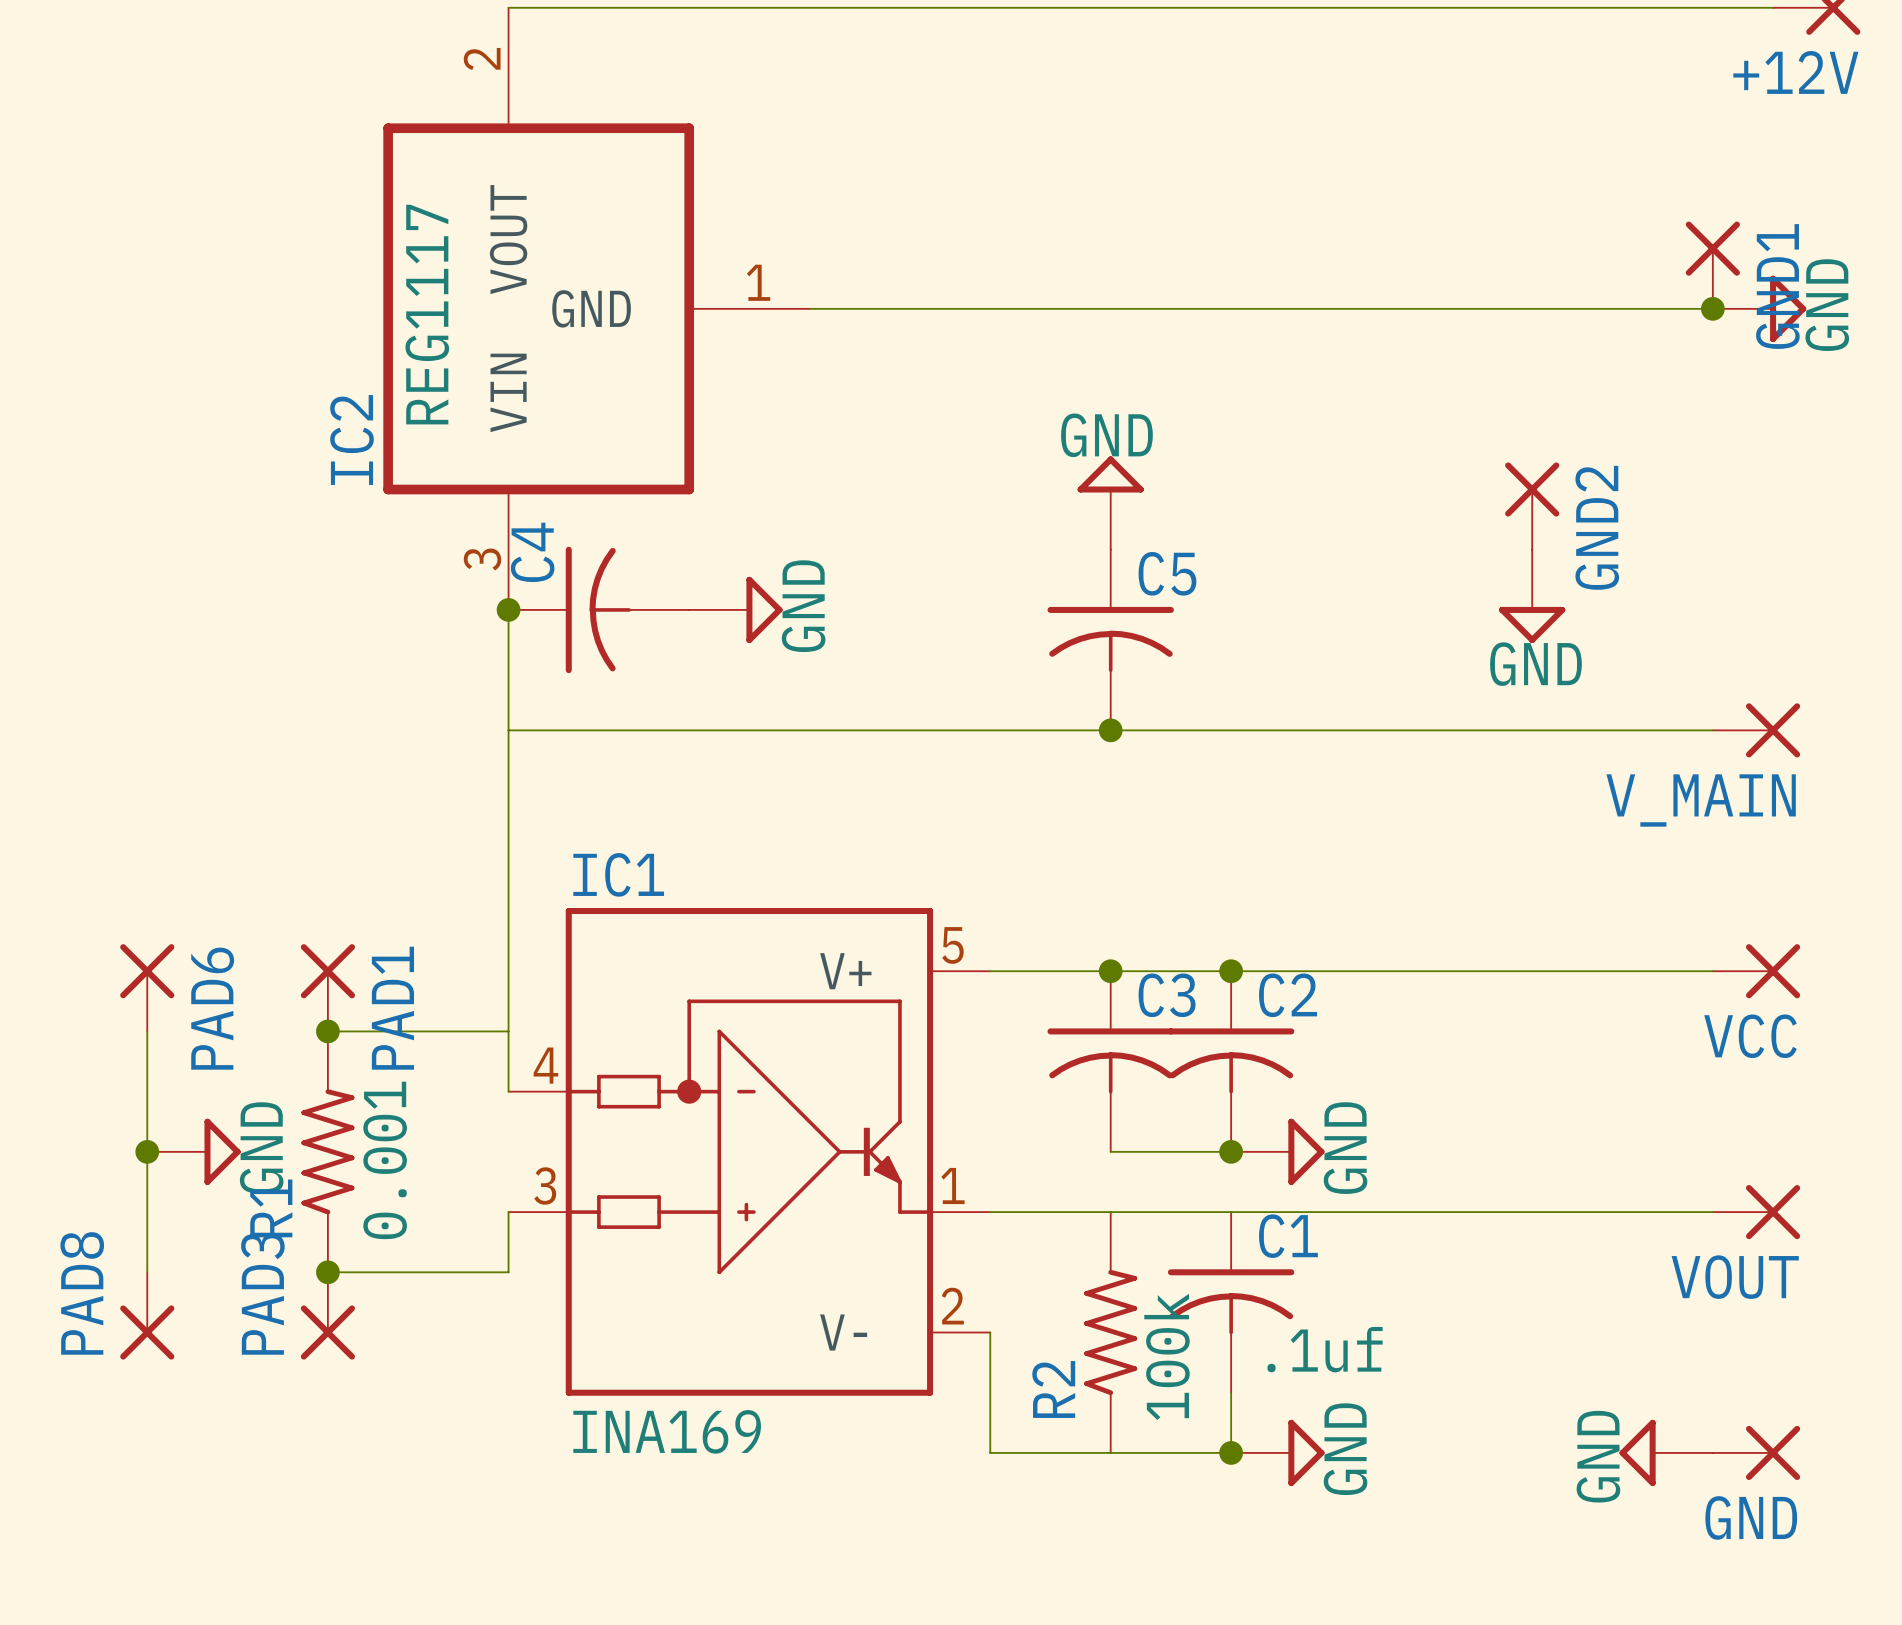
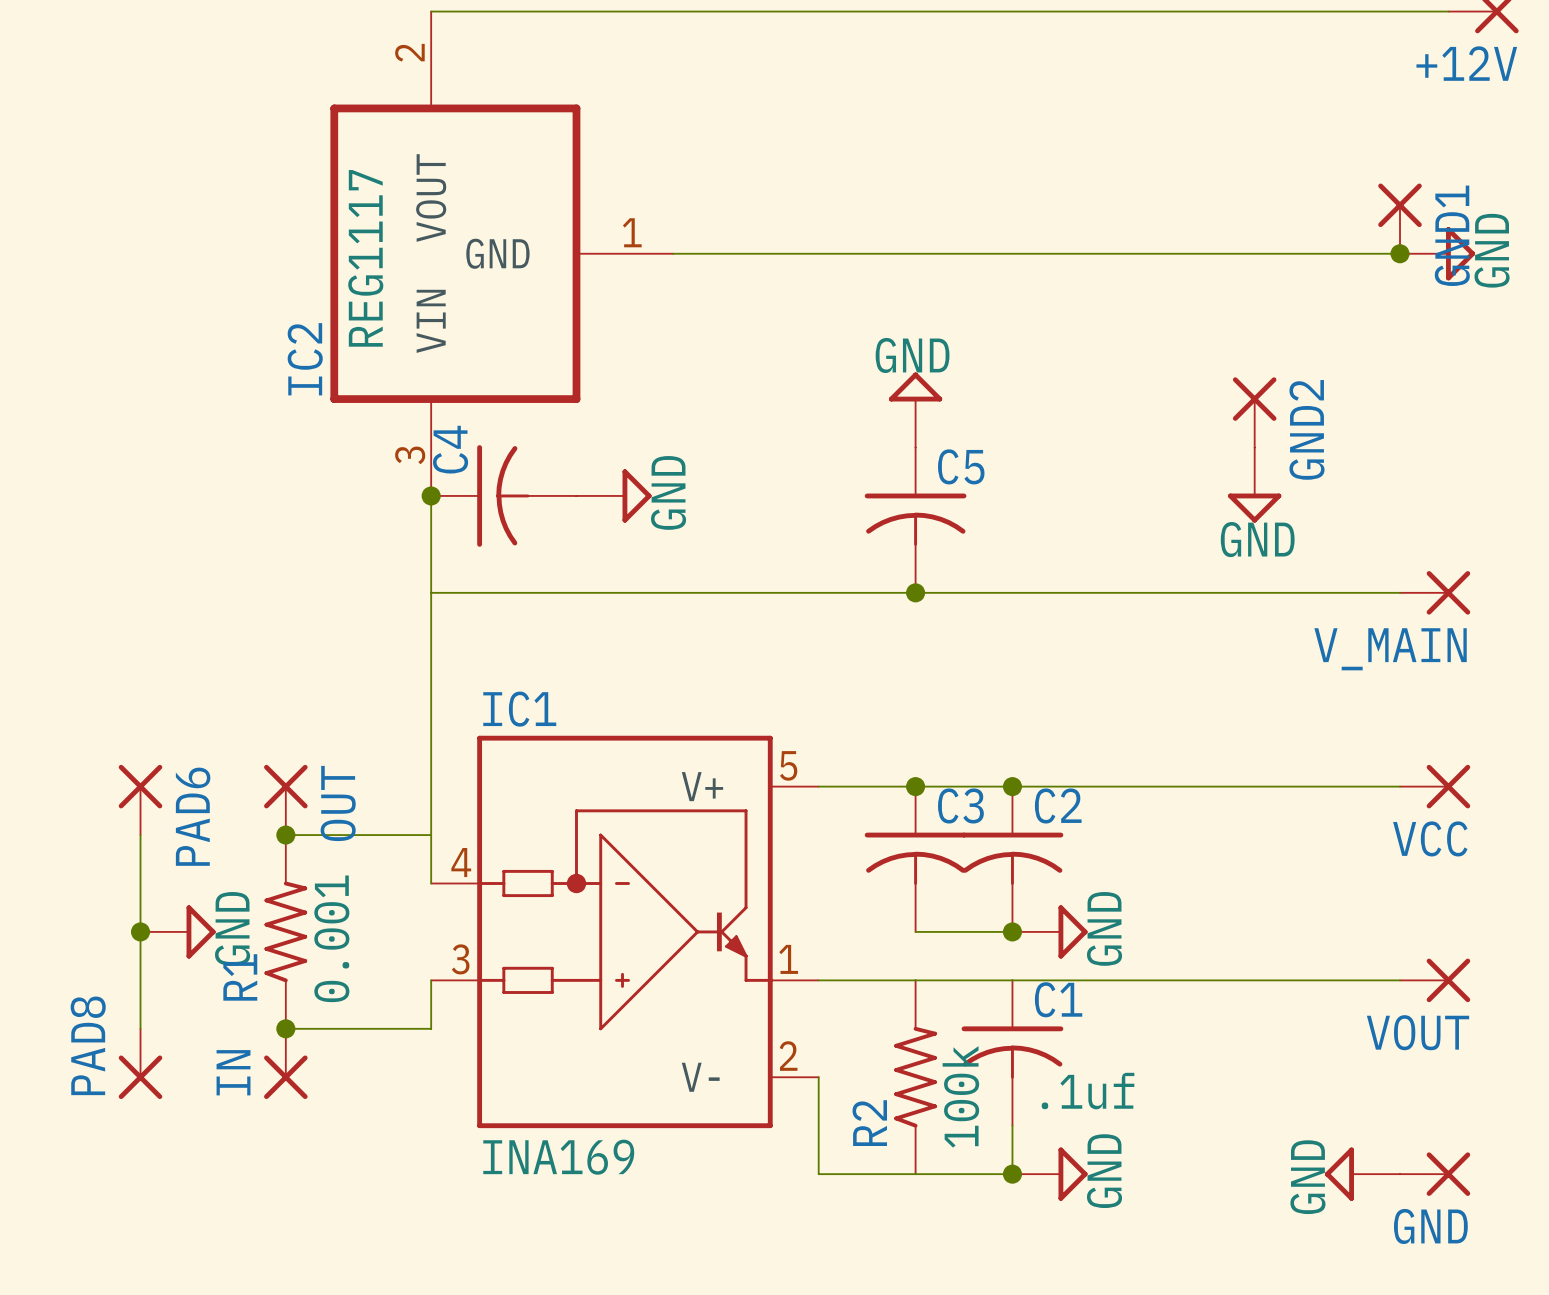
PAD1 name: PAD1 (392, 1008) -> OUT (338, 803)
PAD3 name: PAD3 (262, 1294) -> IN (233, 1072)

